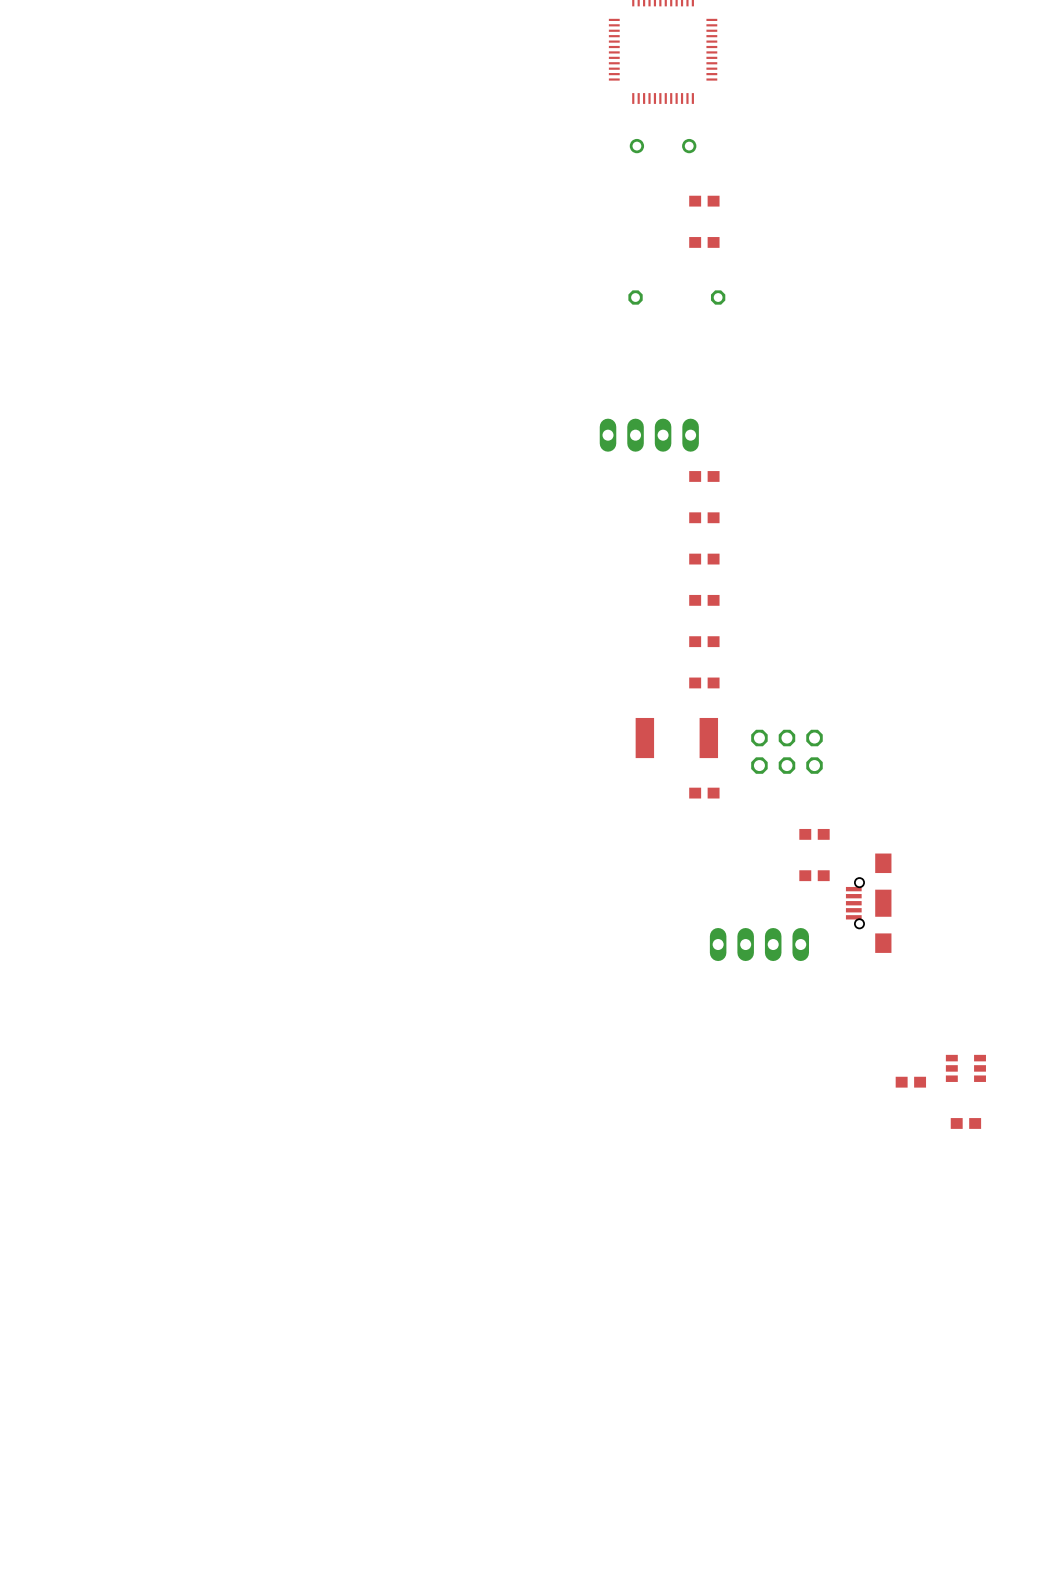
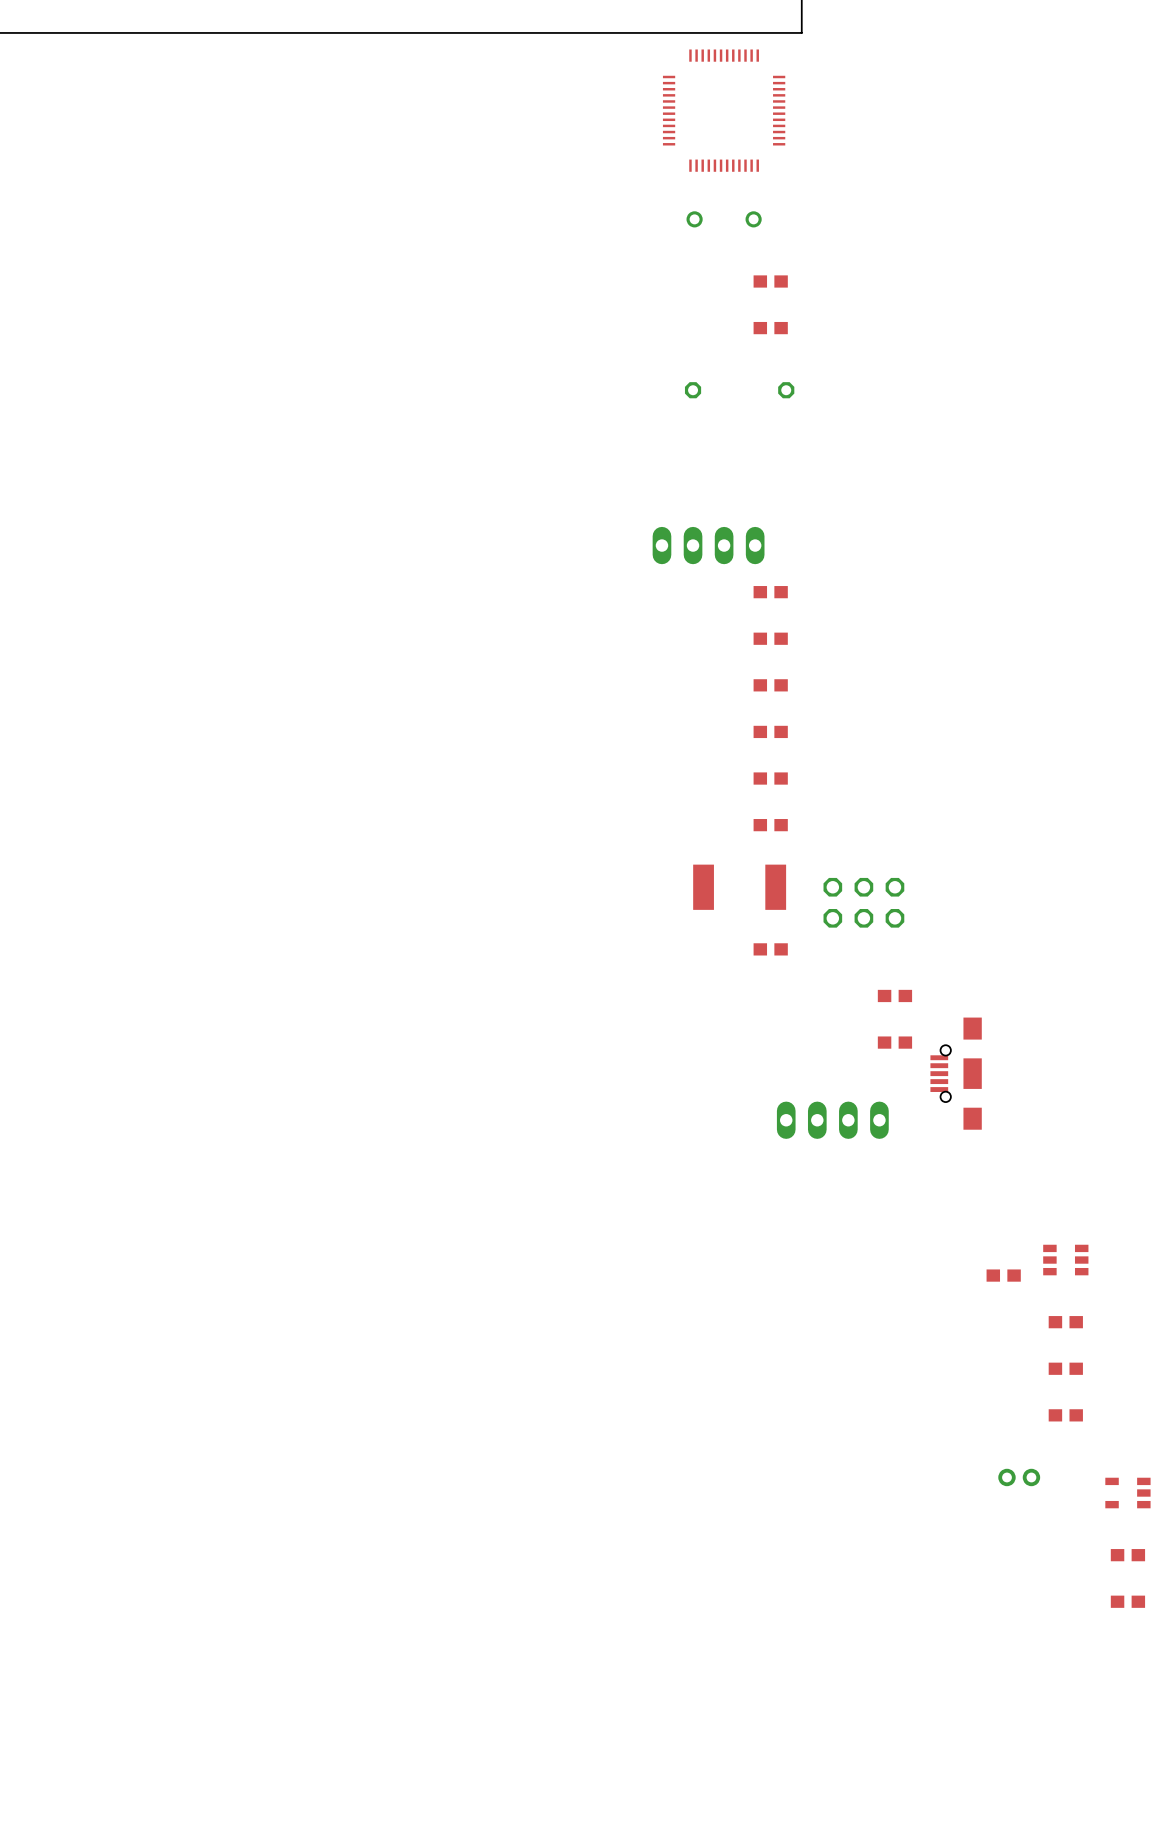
part: none -> (1065, 1368)
part: none -> (1065, 1415)
part: none -> (1019, 1477)
part: none -> (1127, 1493)
part: none -> (1127, 1555)
part: none -> (1127, 1601)

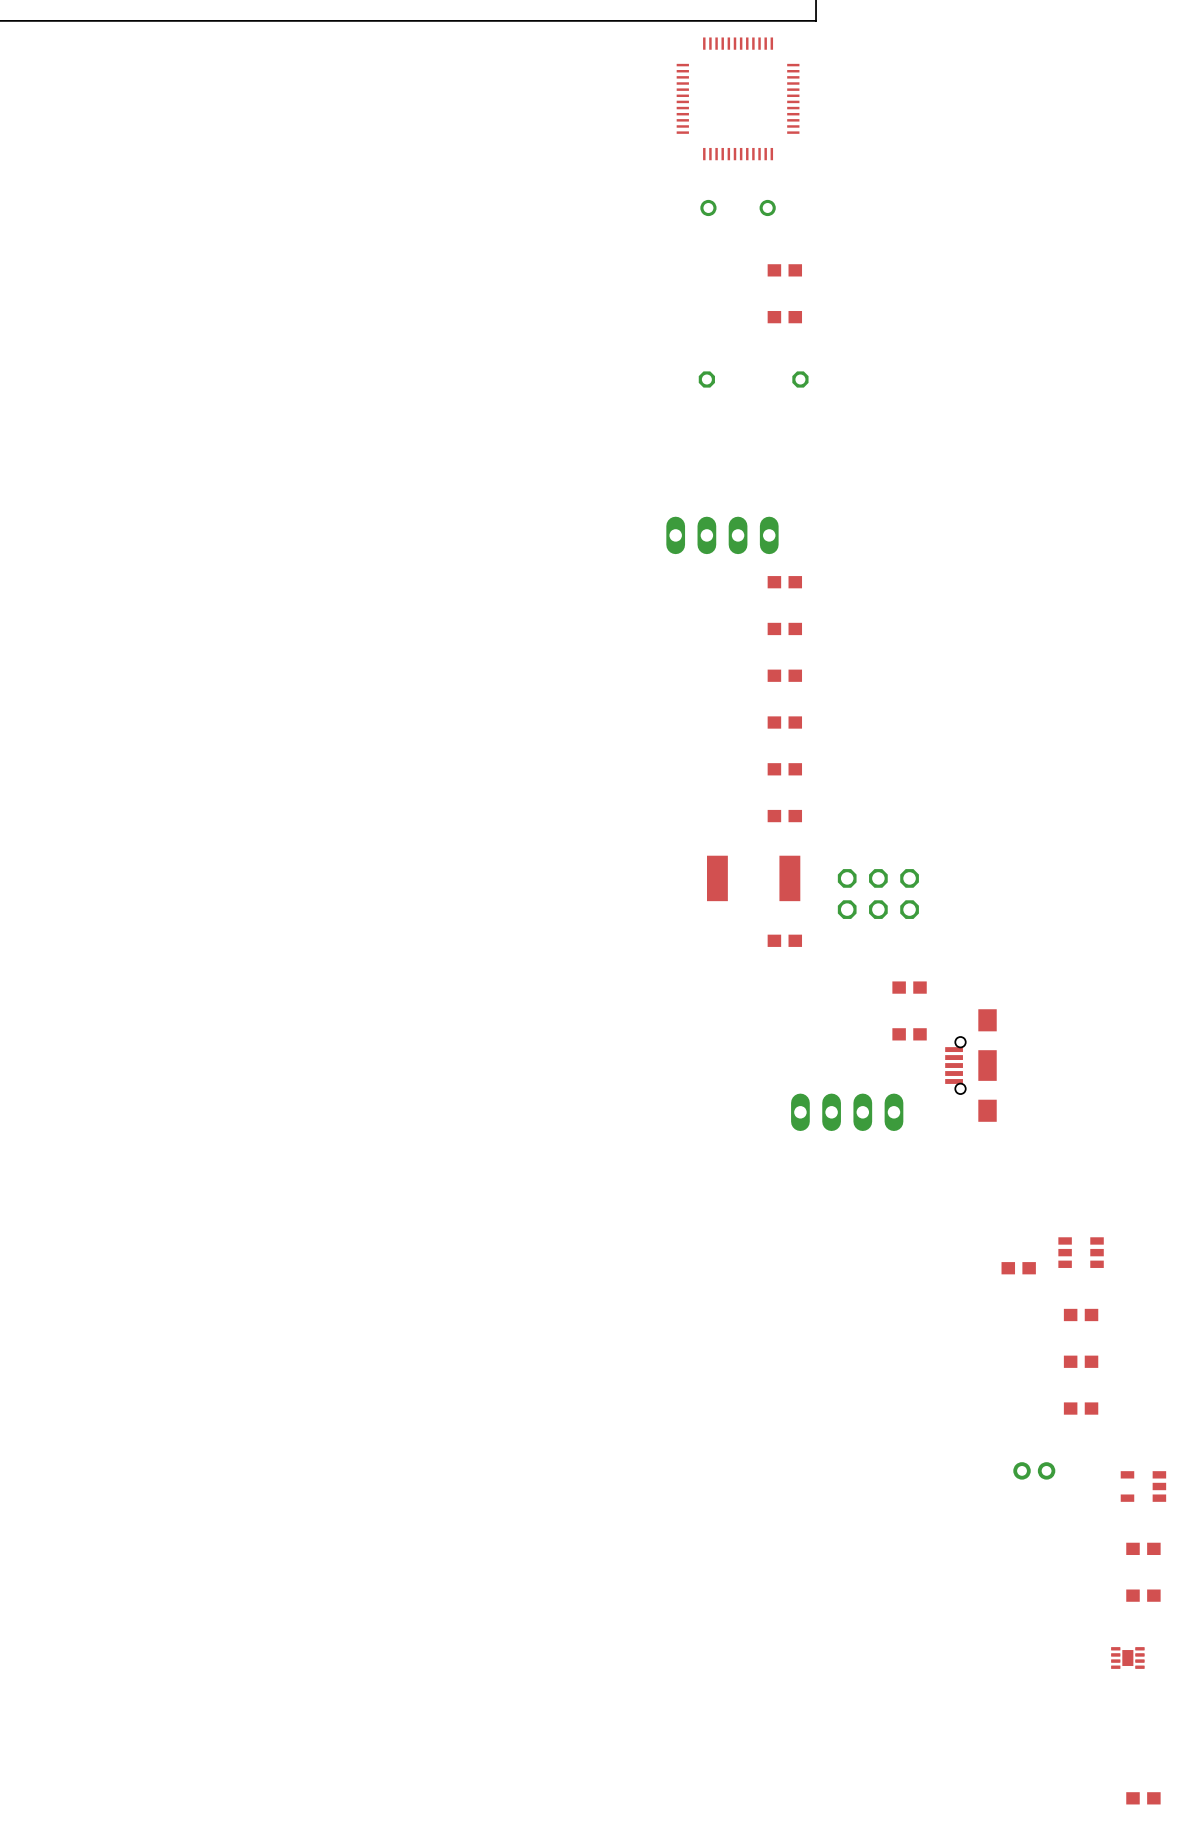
part: none -> (1127, 1658)
part: none -> (1143, 1798)

